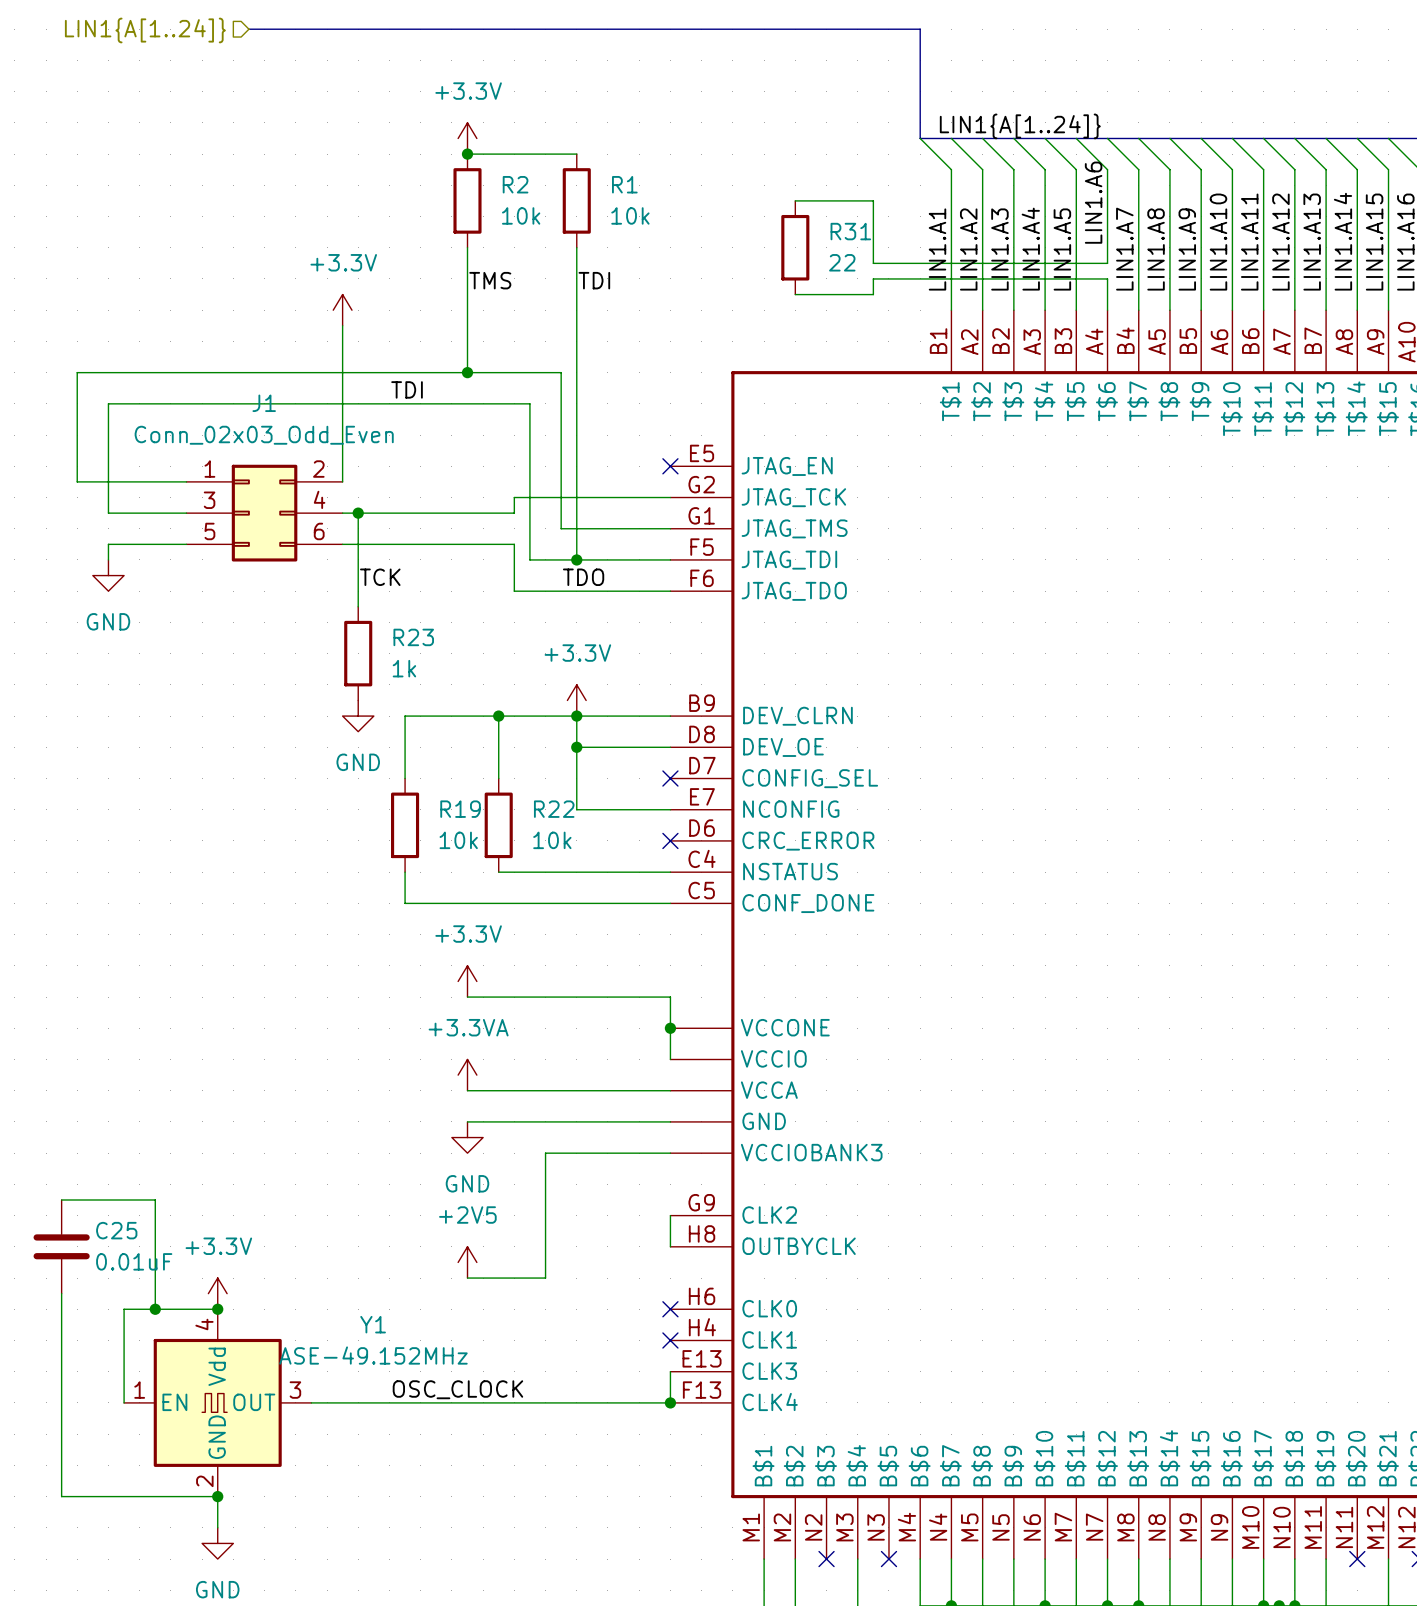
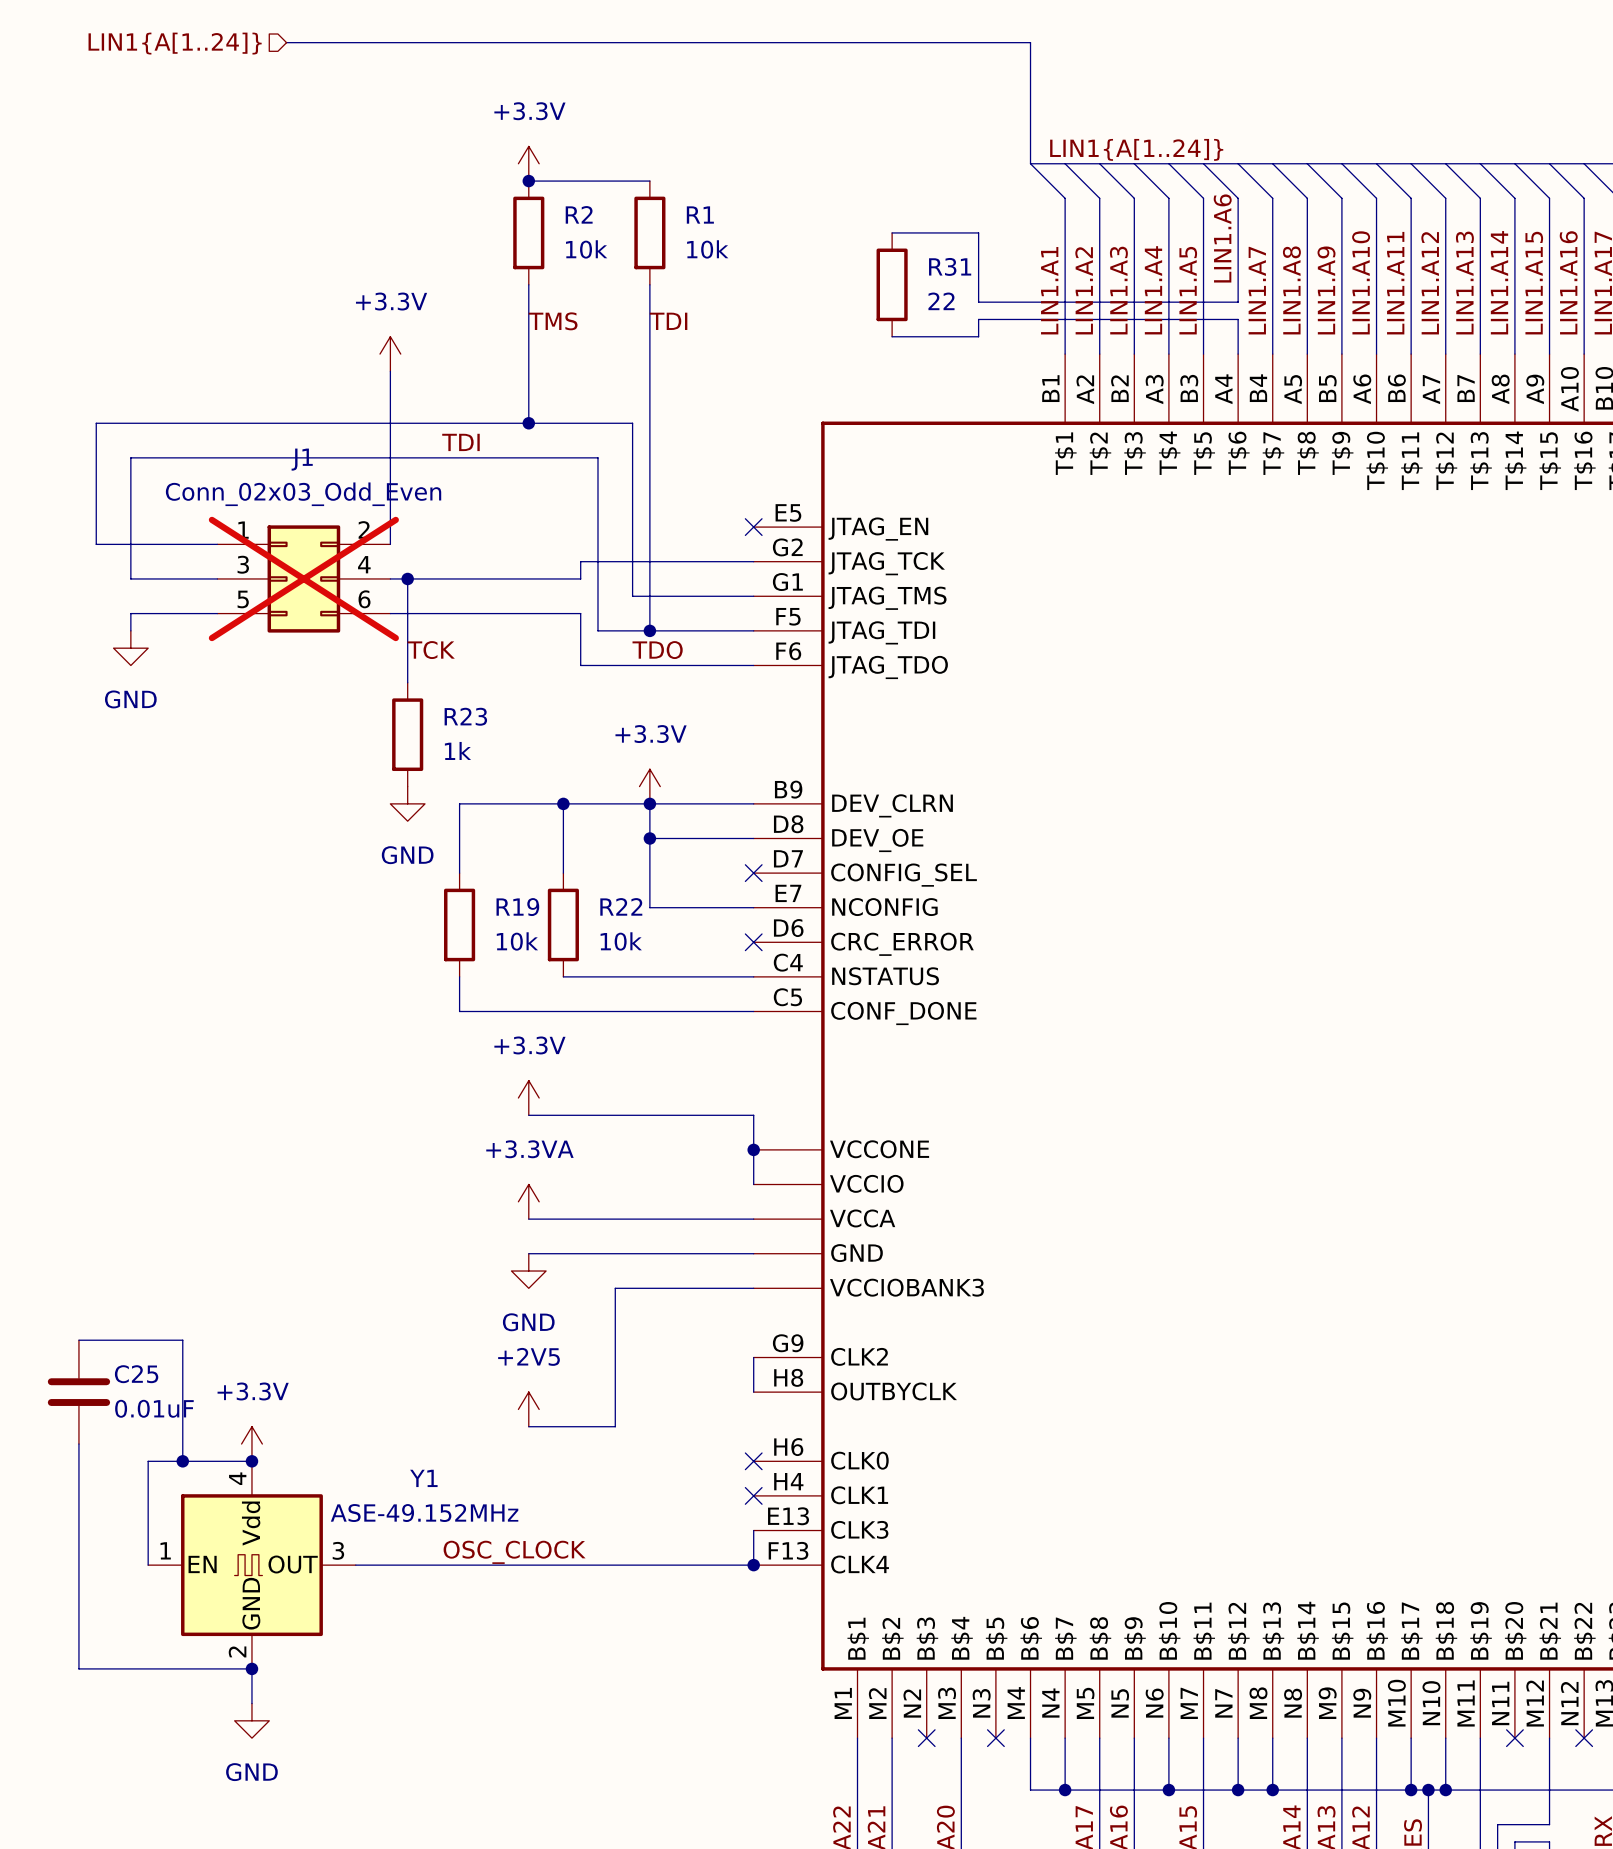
J1 do-not-place cross: none -> (303, 578)

